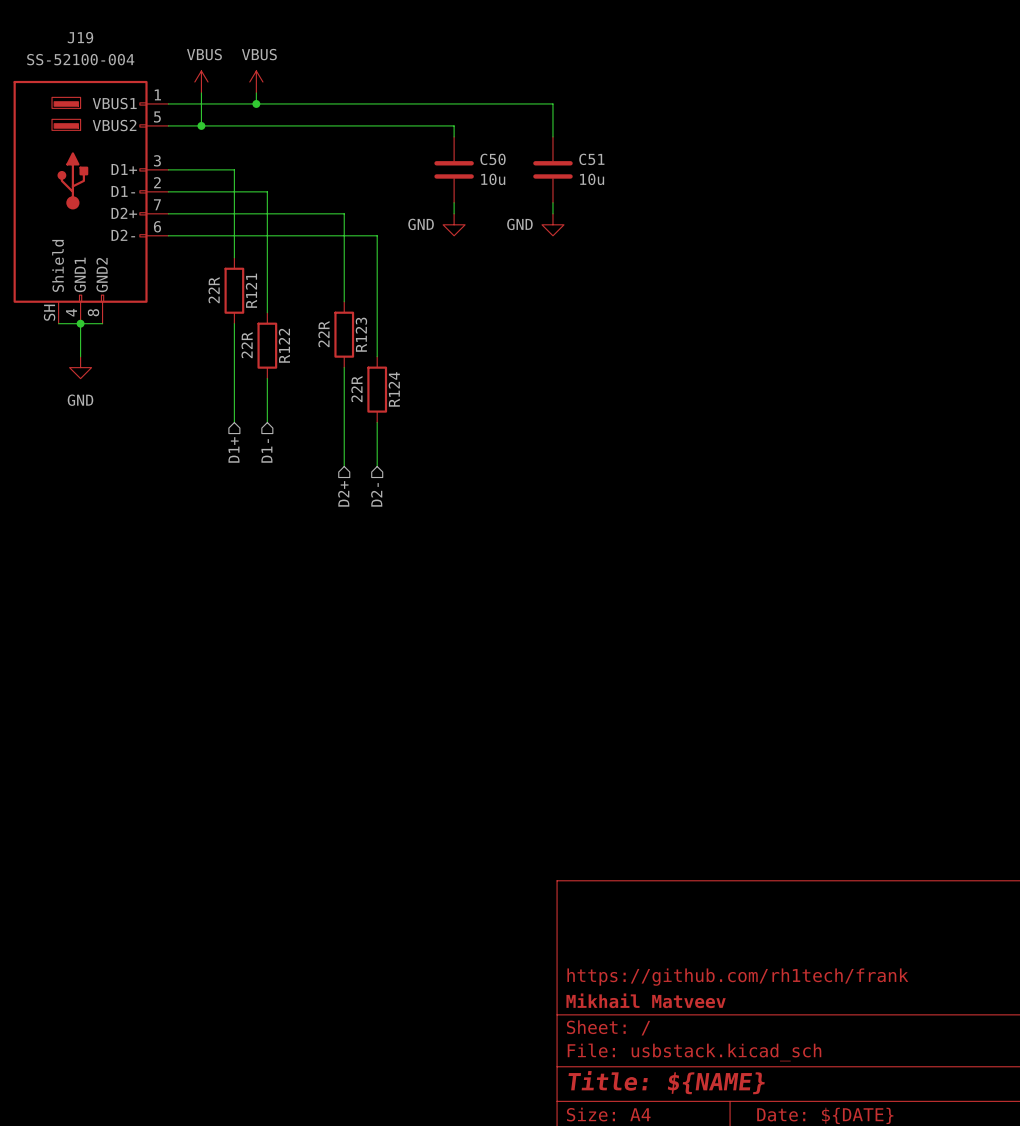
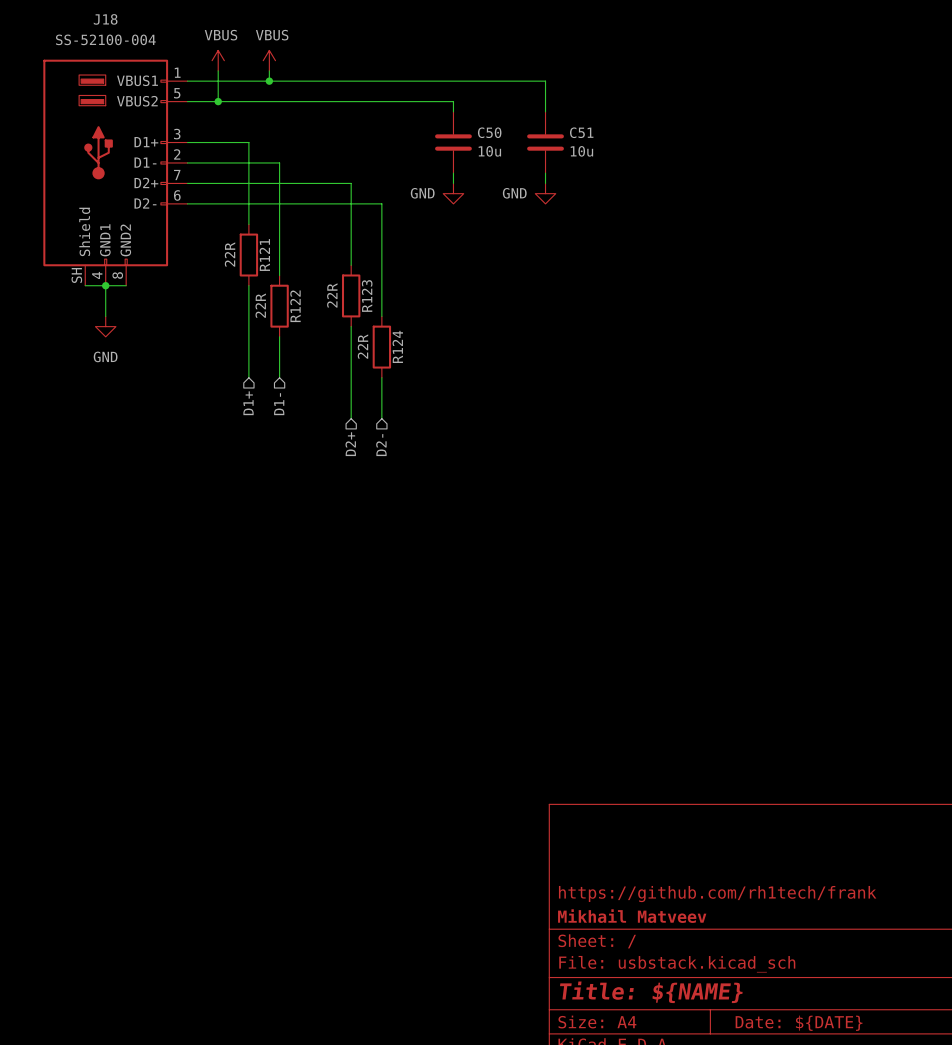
J19 name: J19 (80, 37) -> J18 (105, 19)

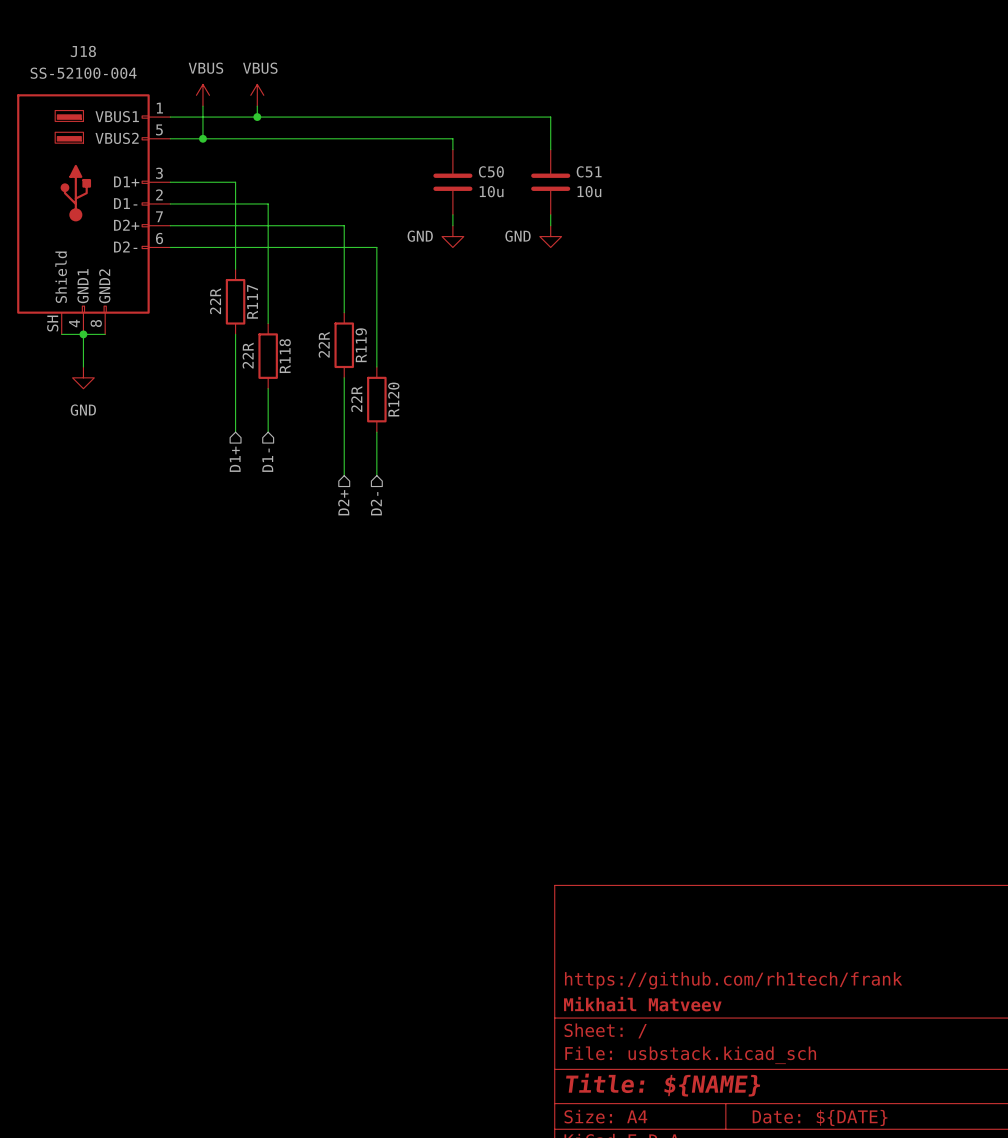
R121 name: R121 (264, 255) -> R117 (252, 301)
R123 name: R123 (367, 295) -> R119 (361, 345)
R122 name: R122 (295, 306) -> R118 (285, 356)
R124 name: R124 (397, 346) -> R120 (393, 399)

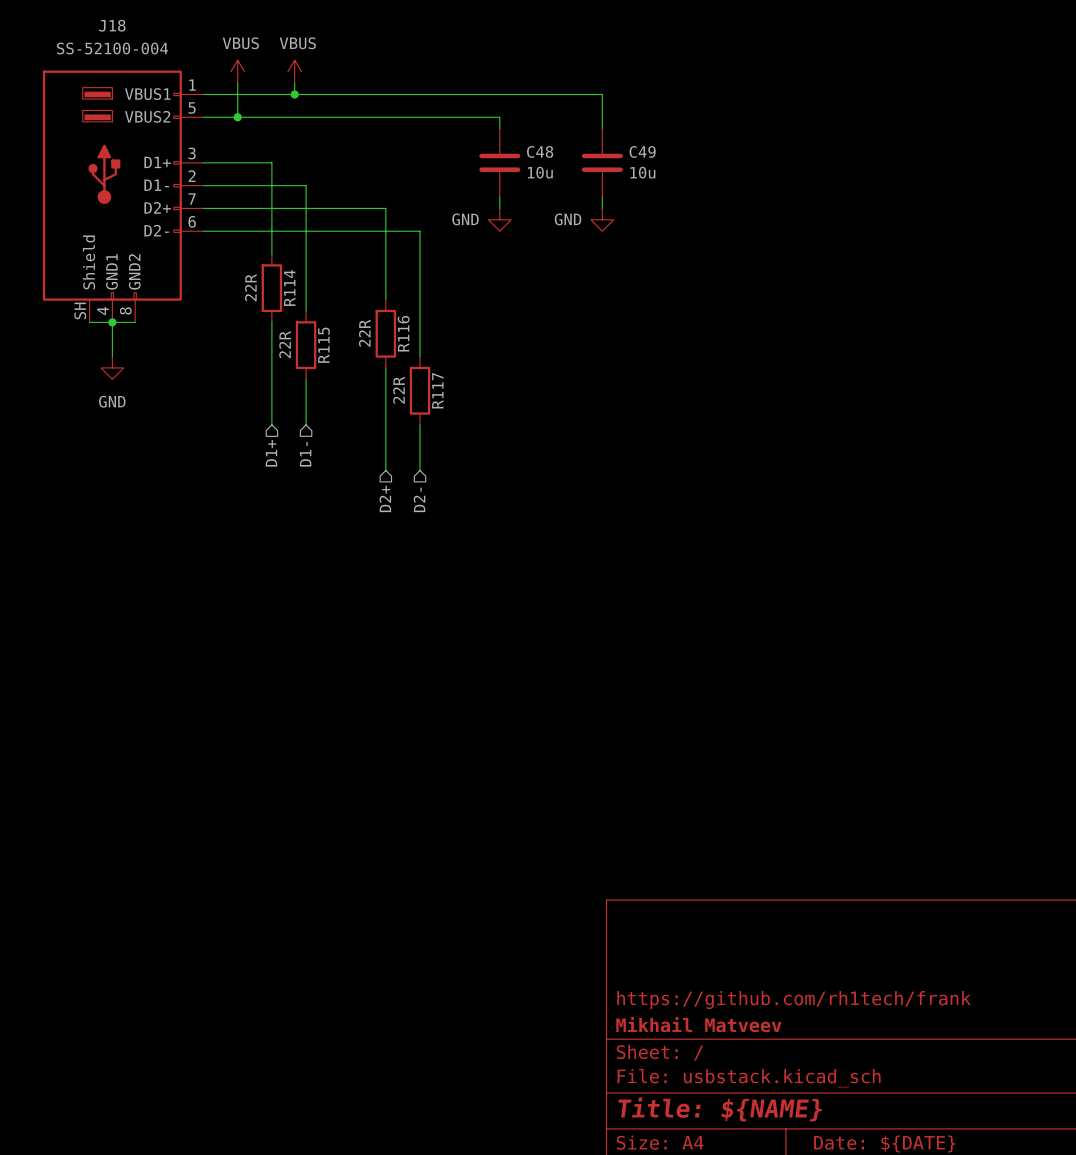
C50 name: C50 (491, 171) -> C48 (540, 151)
C51 name: C51 (589, 171) -> C49 (642, 151)
R117 name: R117 (252, 301) -> R114 (289, 288)
R119 name: R119 (361, 345) -> R116 (403, 333)
R118 name: R118 (285, 356) -> R115 (323, 345)
R120 name: R120 (393, 399) -> R117 (437, 390)

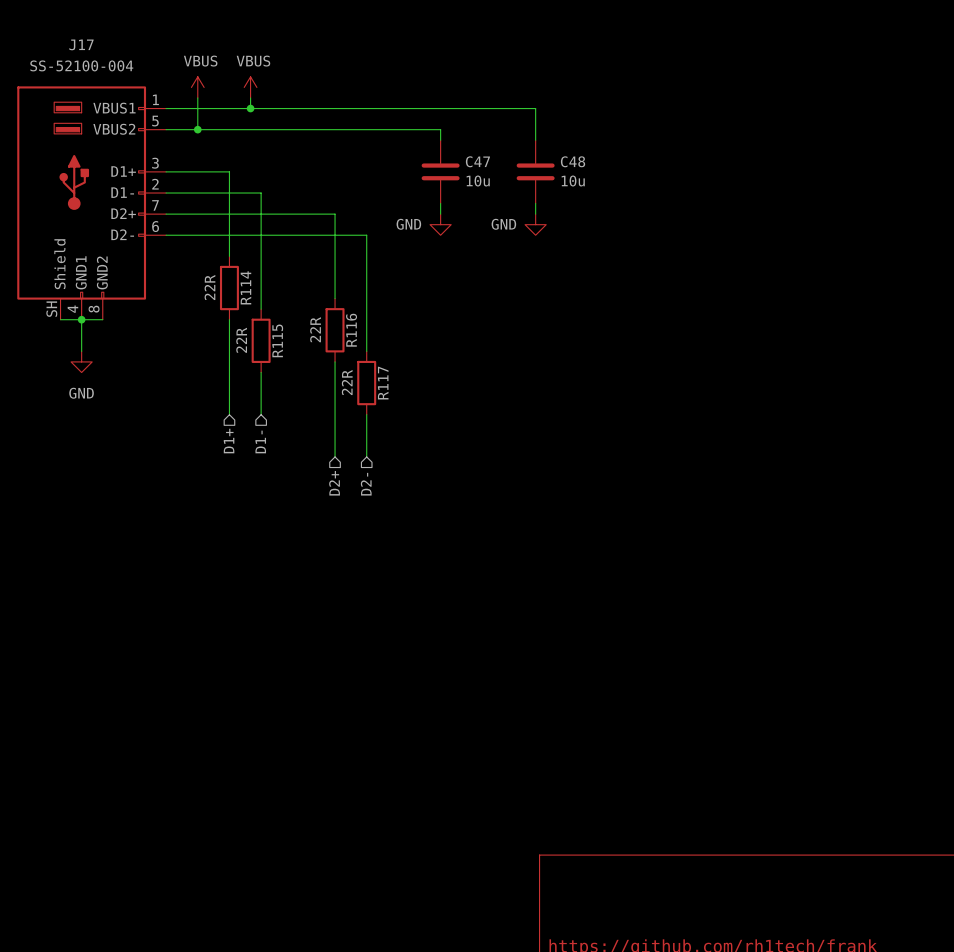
J18 name: J18 (112, 25) -> J17 (81, 44)
C48 name: C48 (540, 151) -> C47 (477, 161)
C49 name: C49 (642, 151) -> C48 (573, 161)

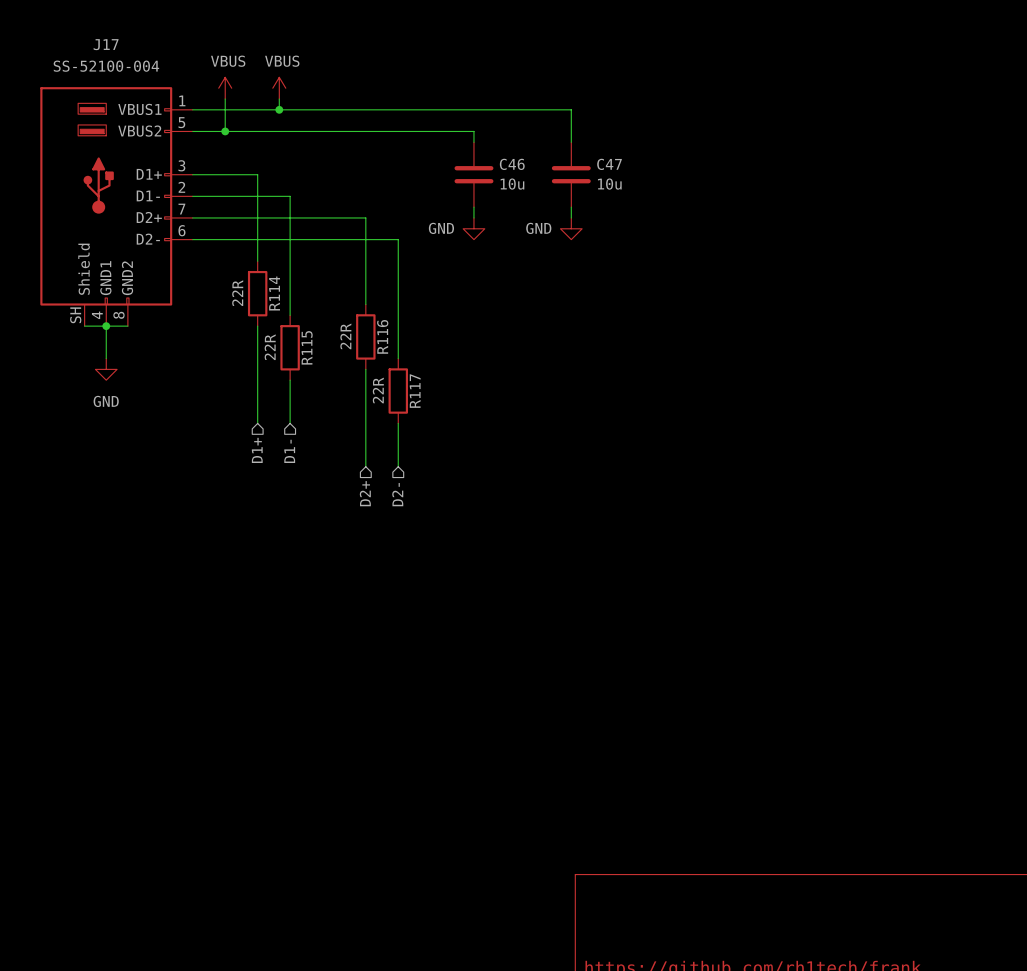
C47 name: C47 (477, 161) -> C46 (512, 164)
C48 name: C48 (573, 161) -> C47 (609, 164)

